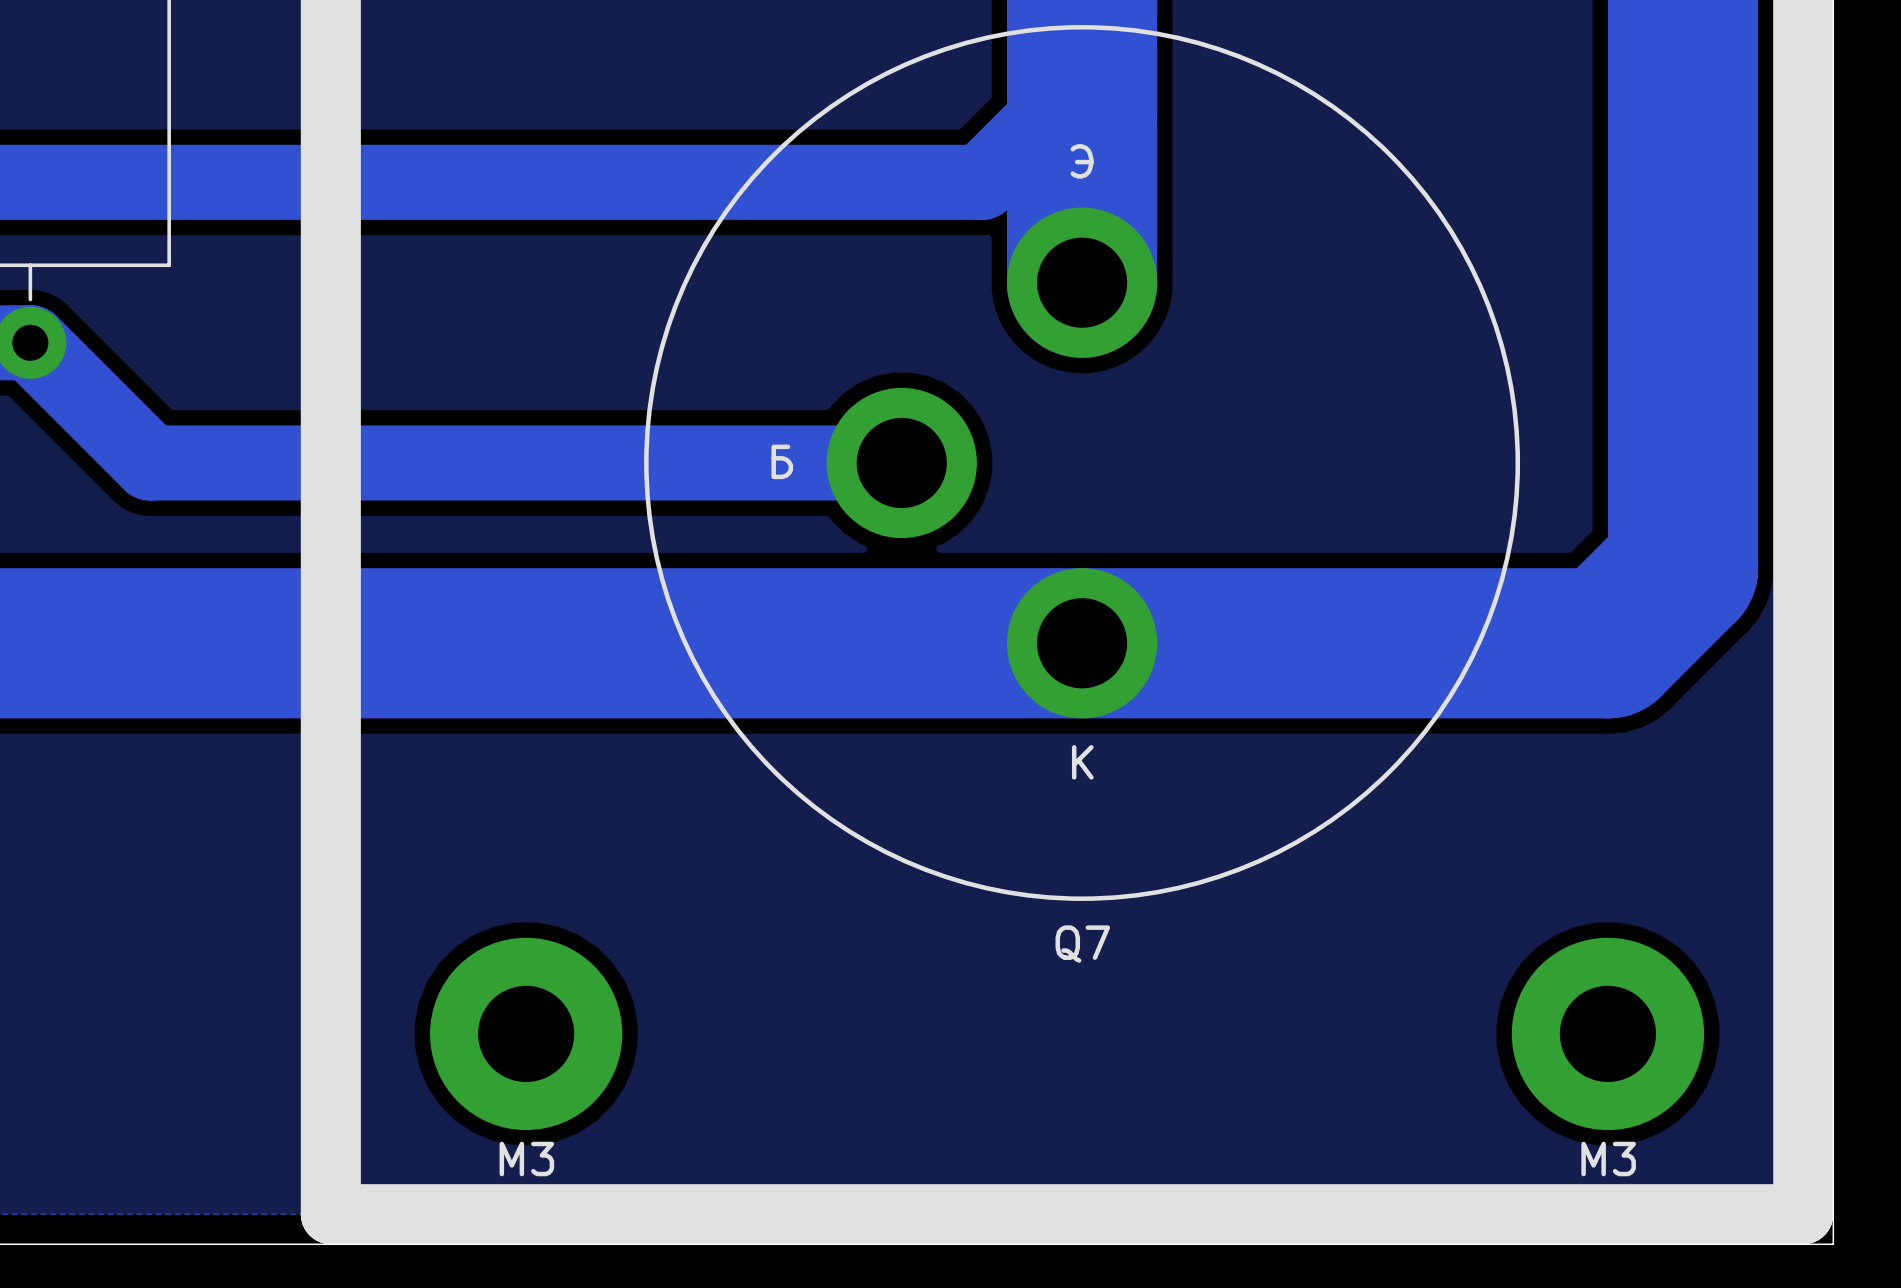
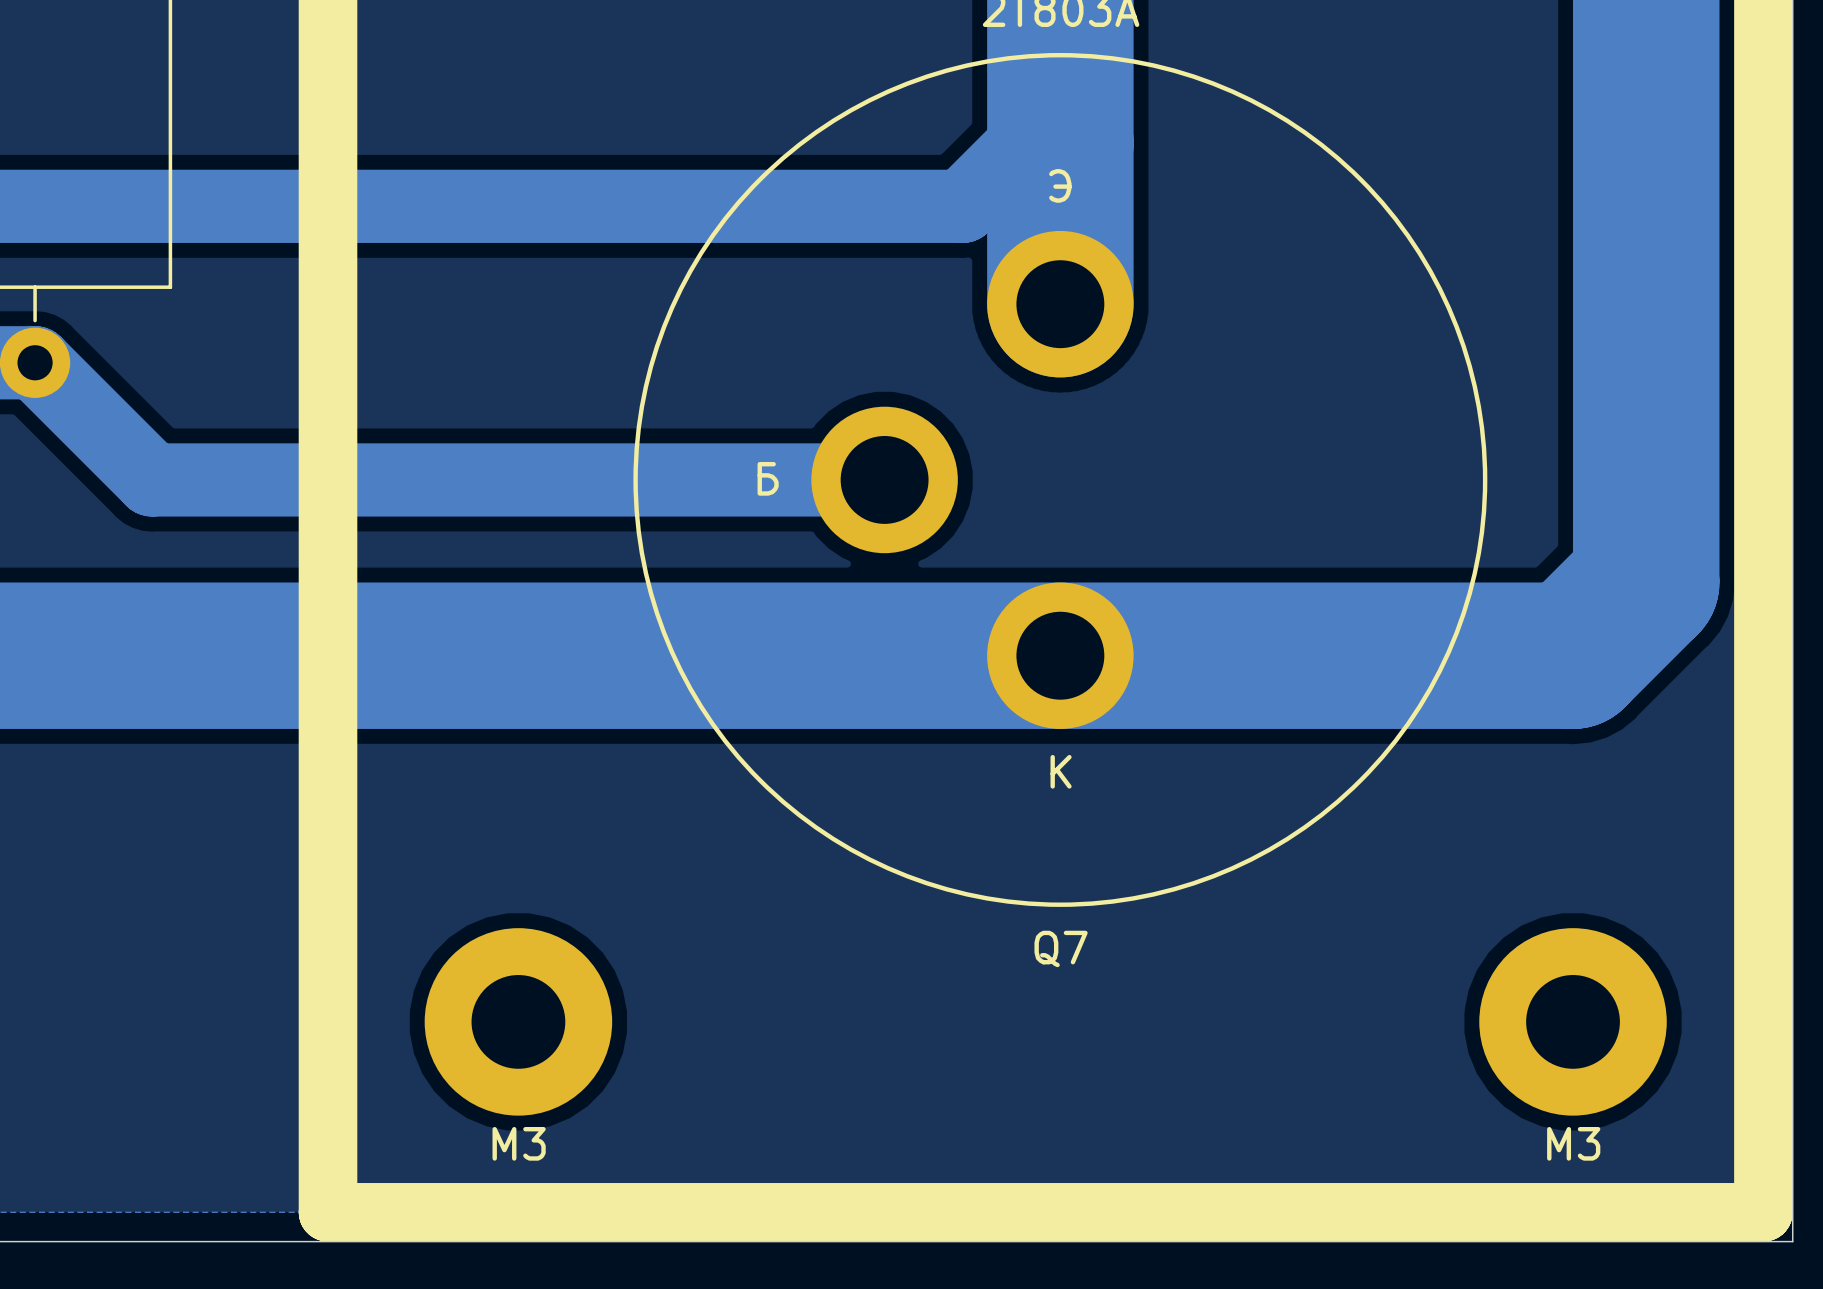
part position: (526, 1033) -> (518, 1021)
part position: (1607, 1033) -> (1573, 1021)

